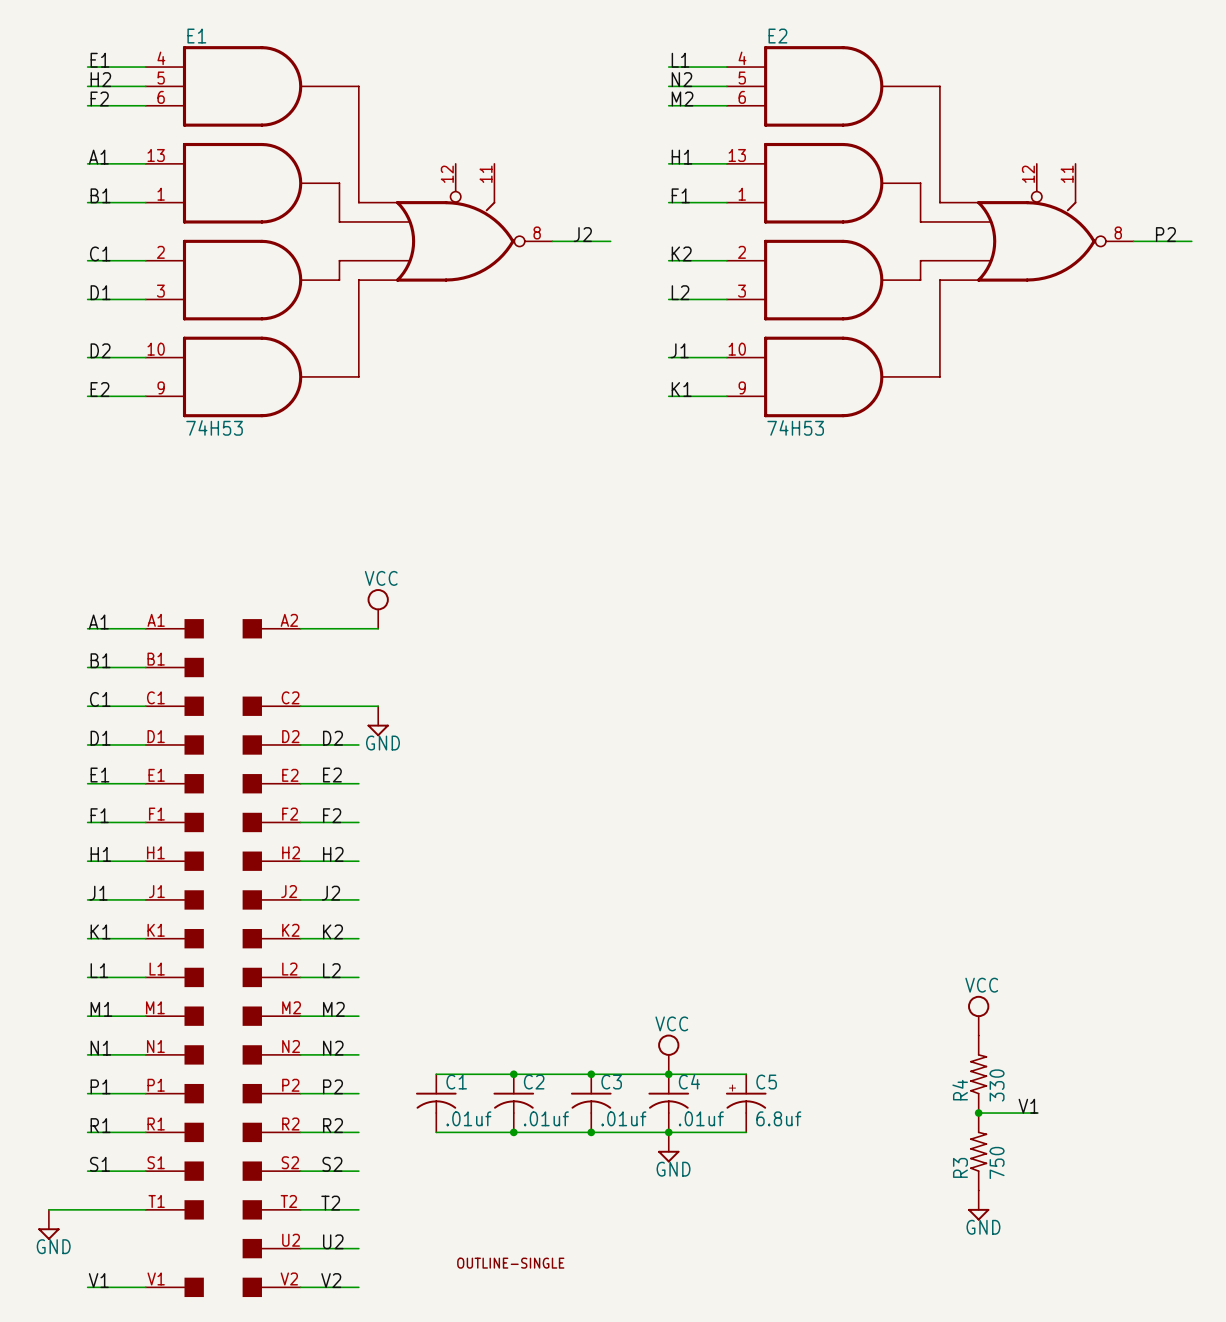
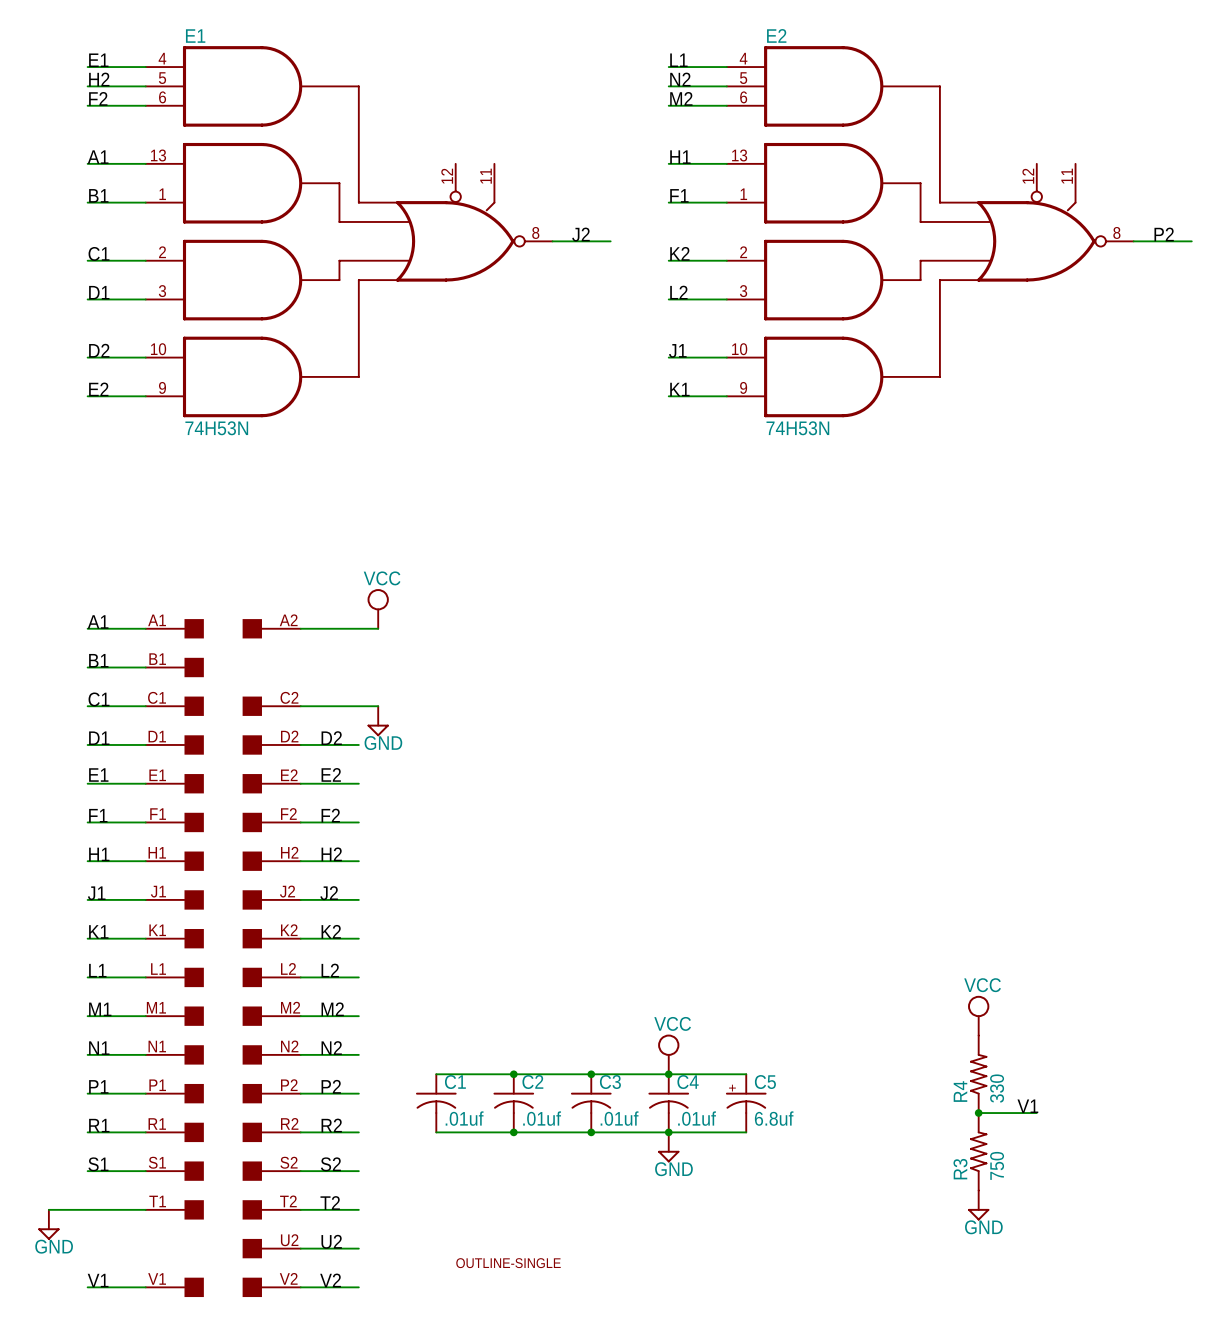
E1 value: 74H53 (214, 427) -> 74H53N (216, 428)
E2 value: 74H53 (795, 427) -> 74H53N (797, 428)

